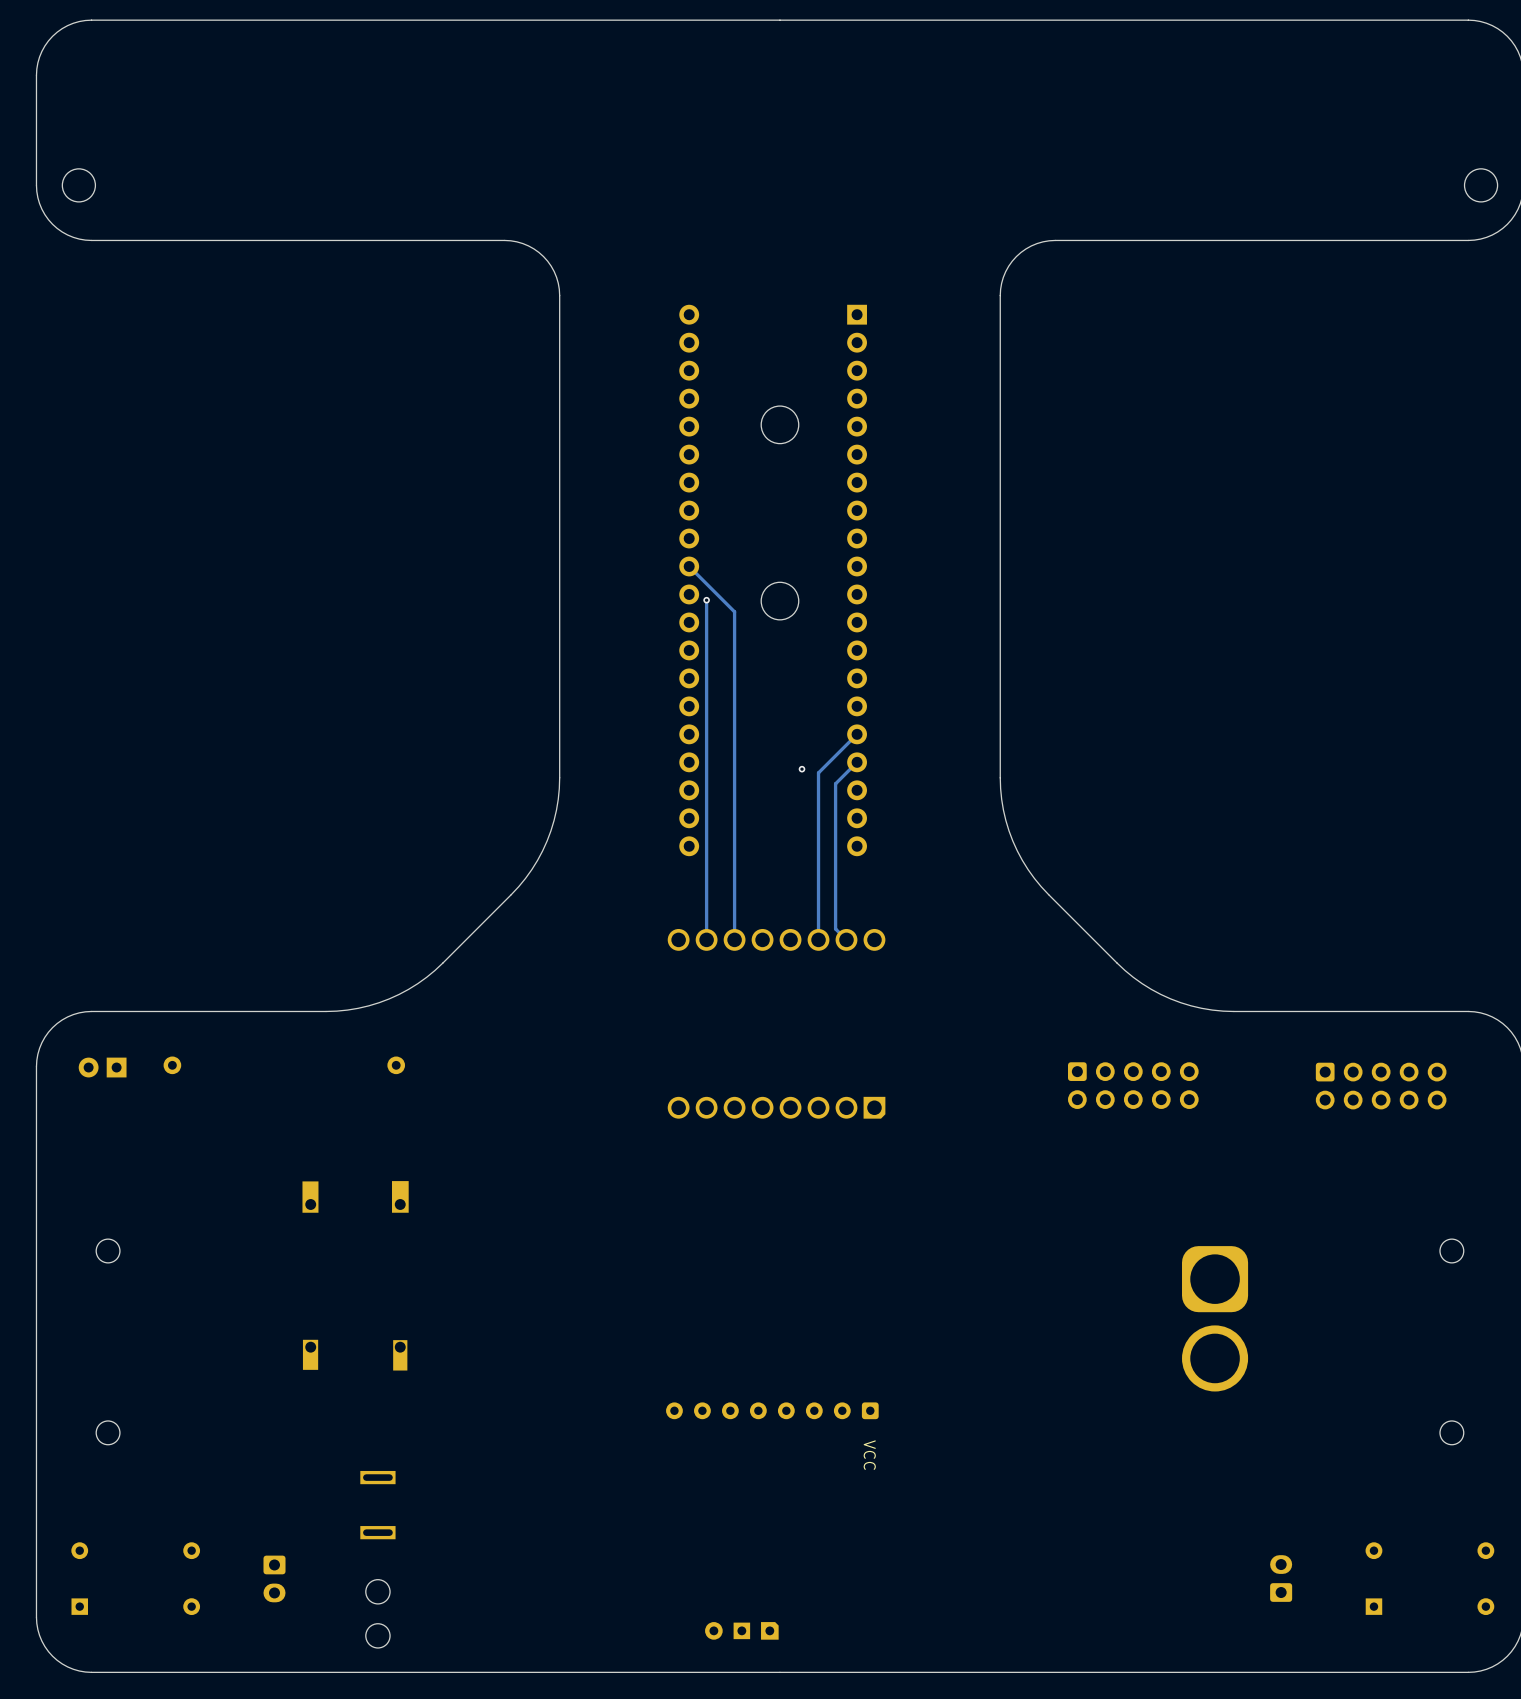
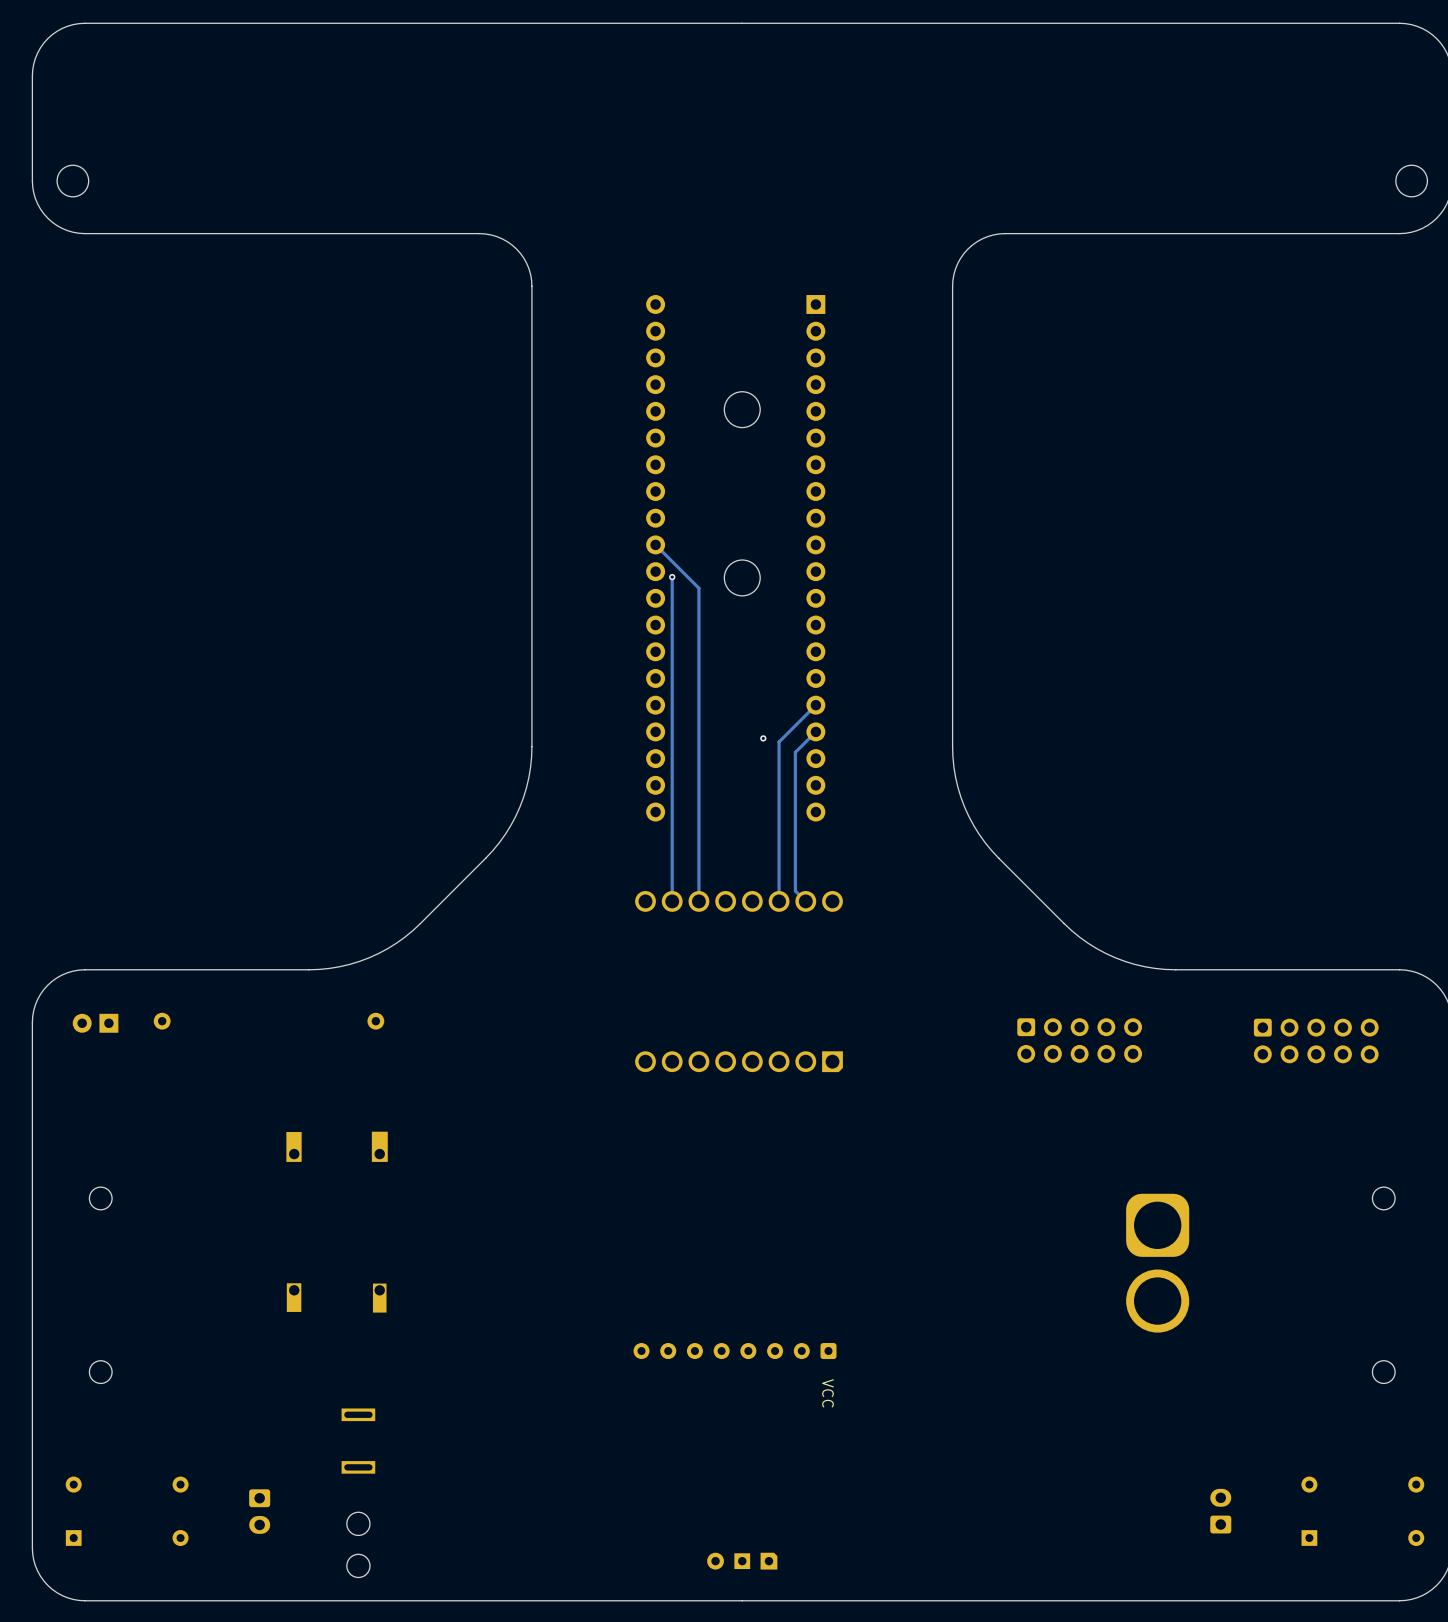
part position: (741, 1630) -> (742, 1561)

